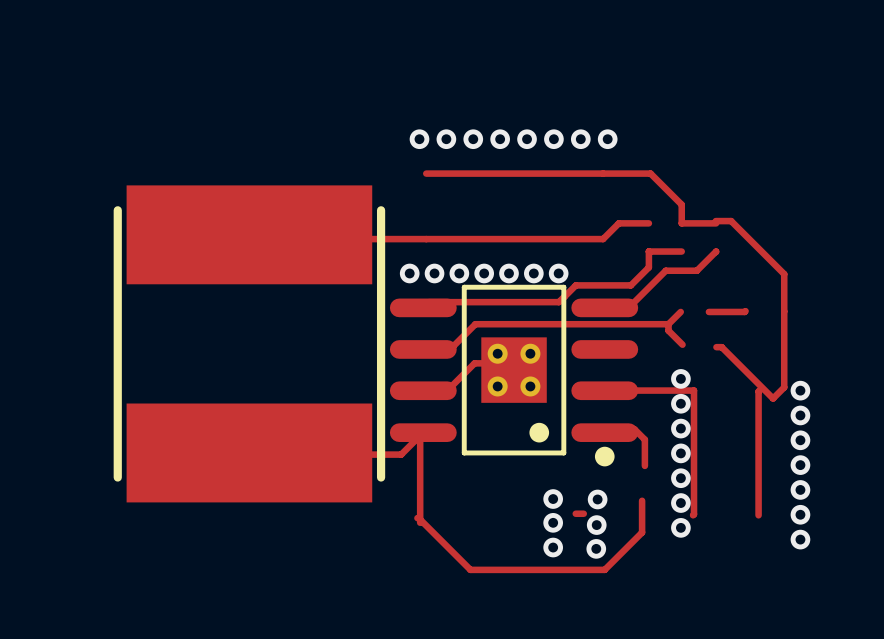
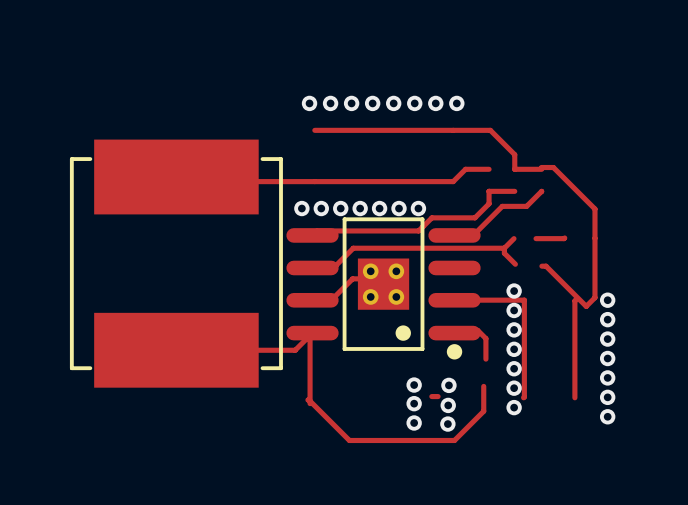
part footprint: [113, 185, 386, 503] -> [69, 139, 283, 388]

